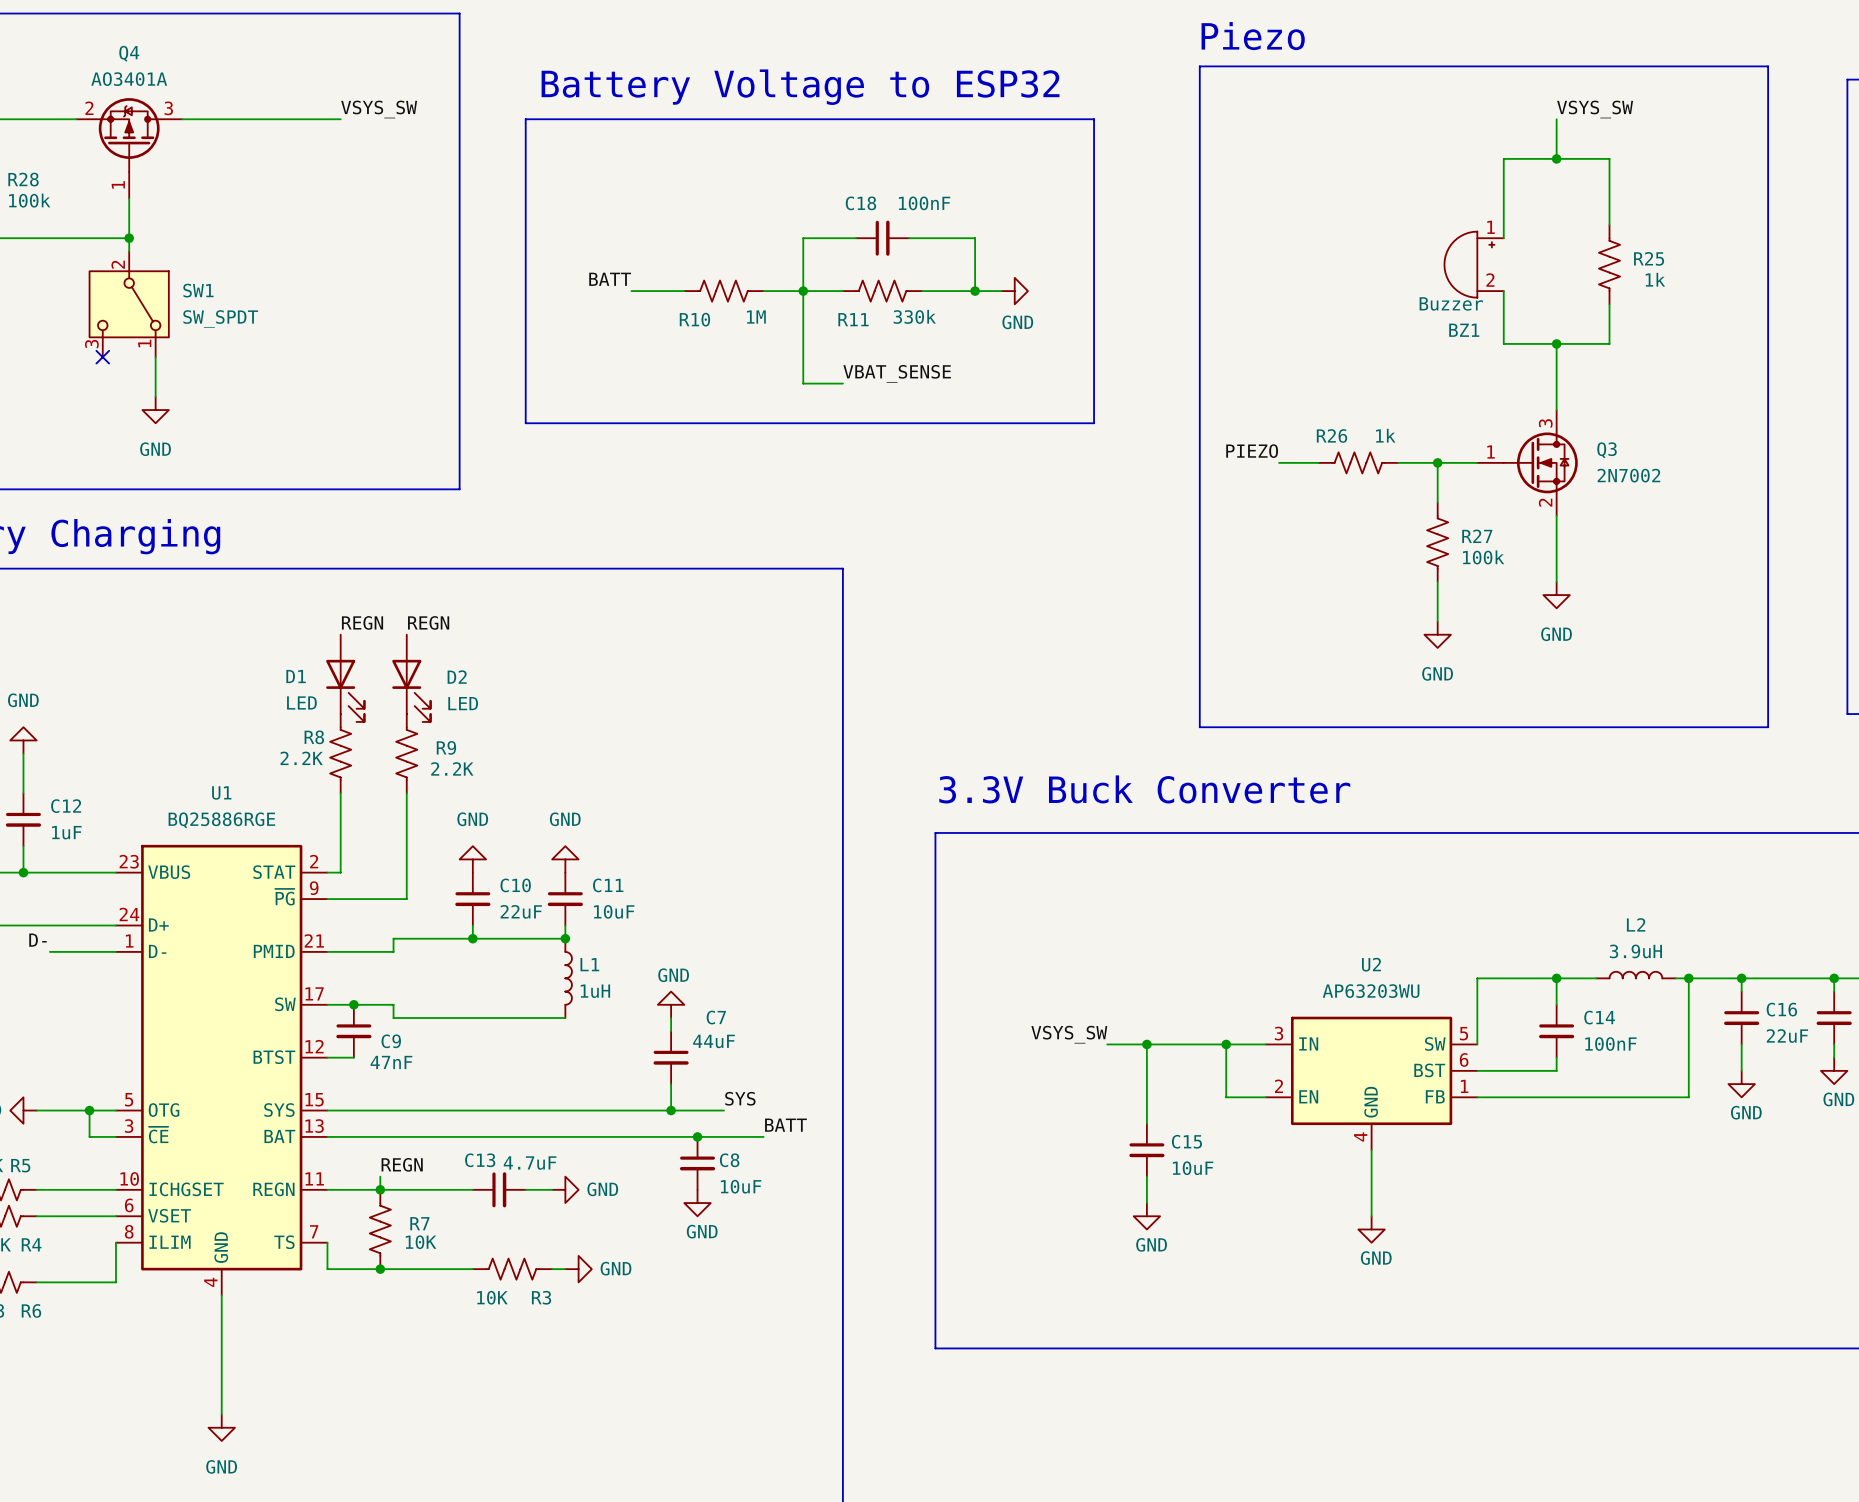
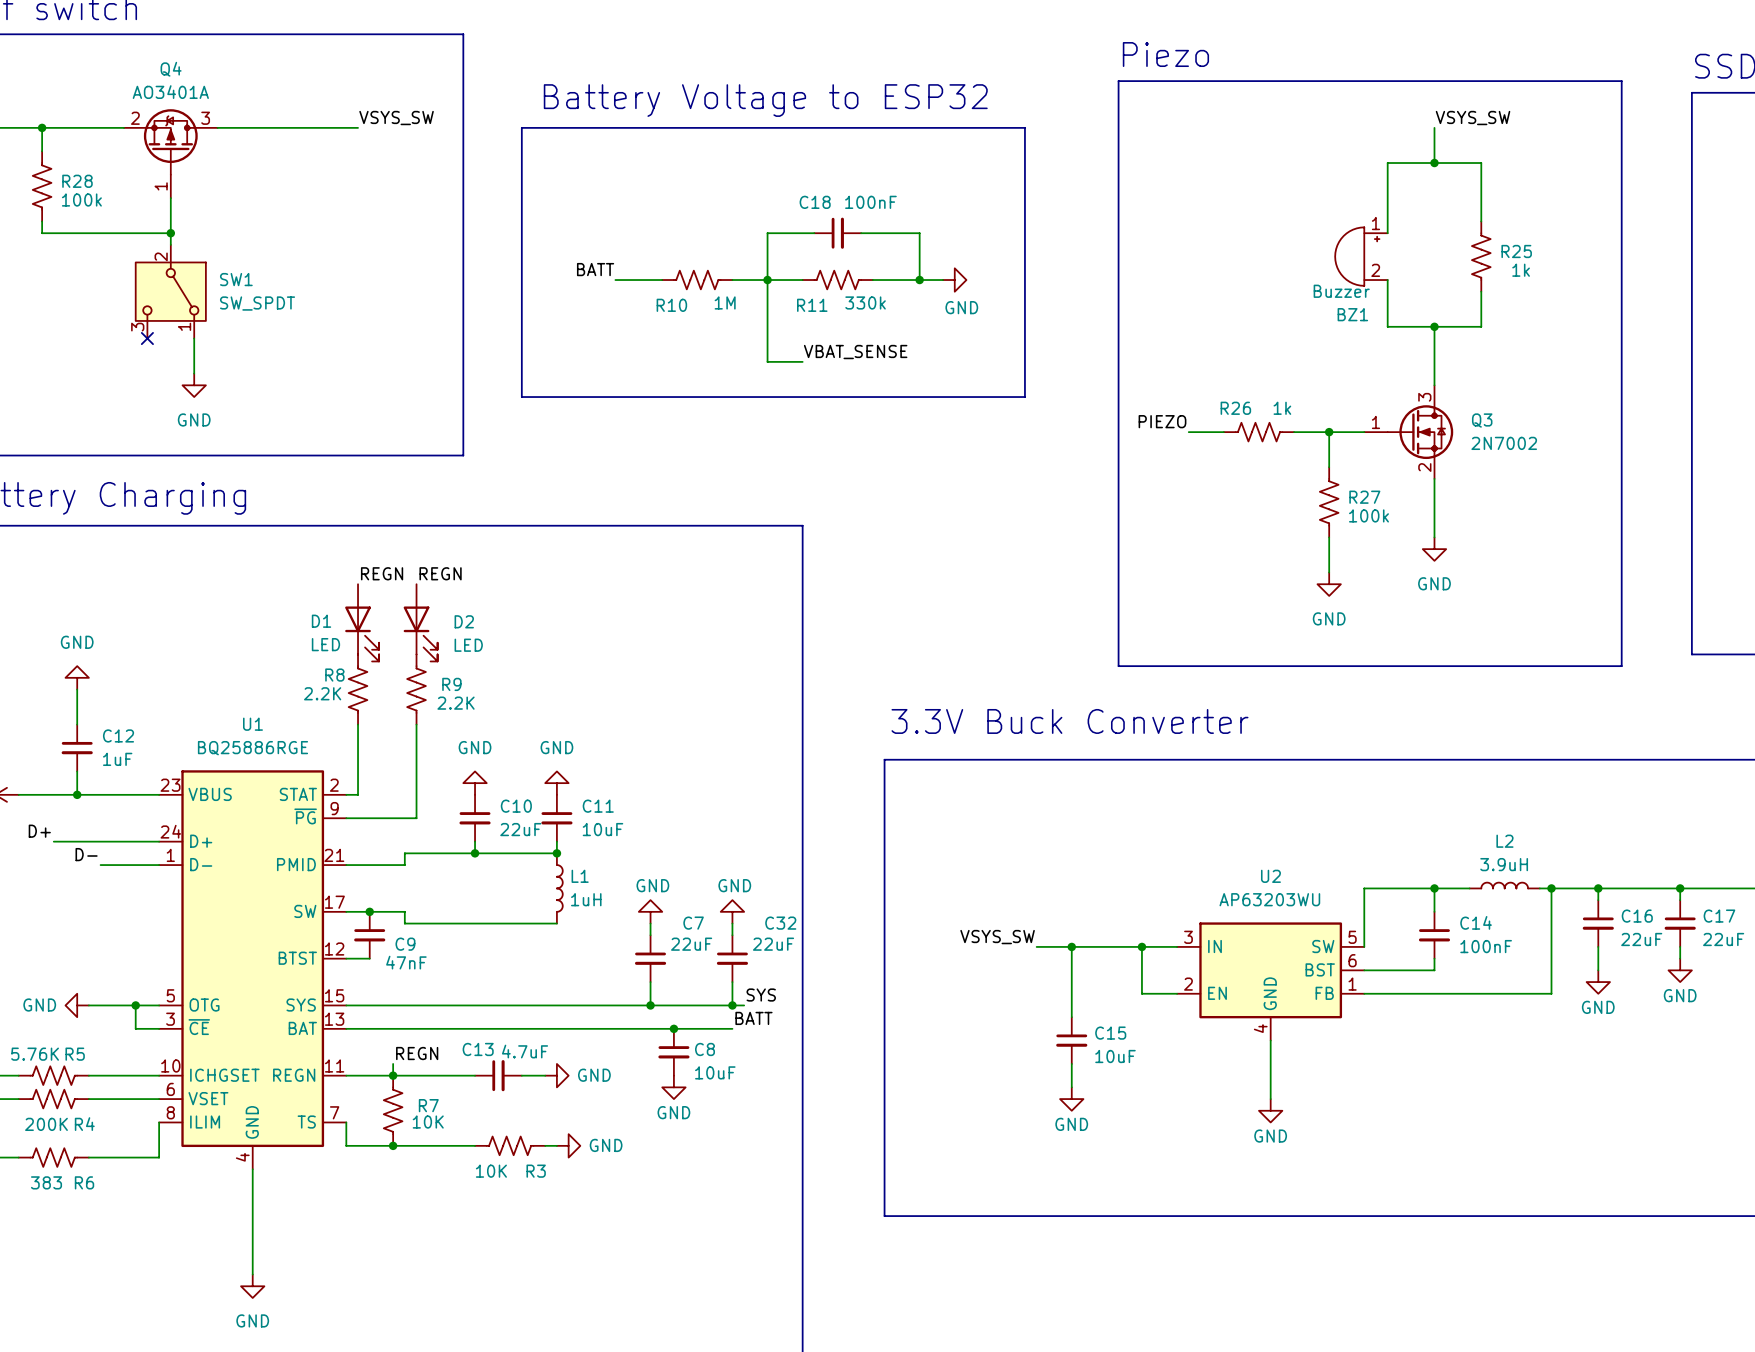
power symbol: none -> GND (732, 911)
wire: none -> (732, 923) (732, 935)
C7 value: 44uF (713, 1041) -> 22uF (691, 944)
C32: none -> 22uF (732, 958)
wire: none -> (732, 982) (732, 1005)
label position: SYS (740, 1098) -> SYS (761, 995)
wire: none -> (697, 1005) (744, 1005)
junction: none -> (732, 1005)

